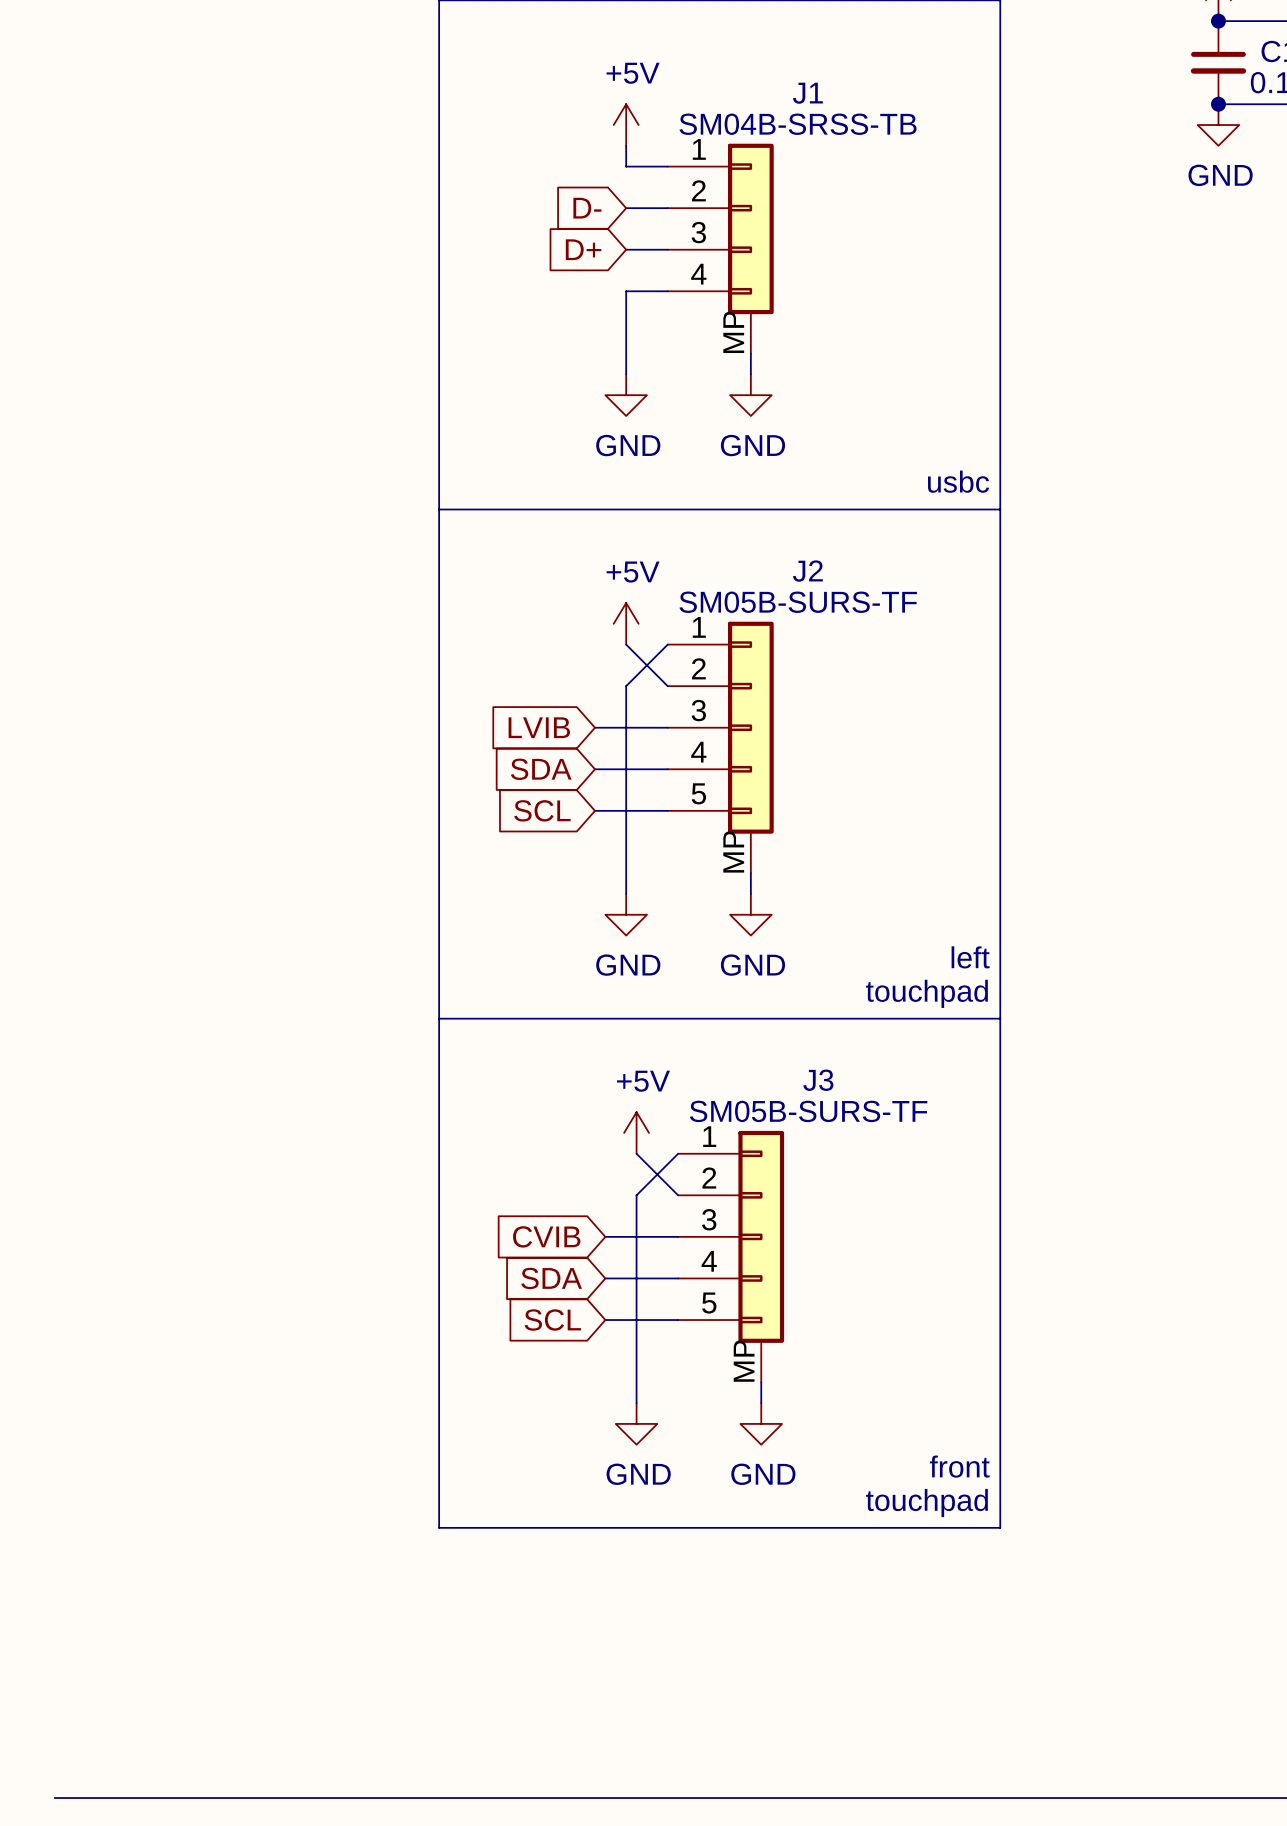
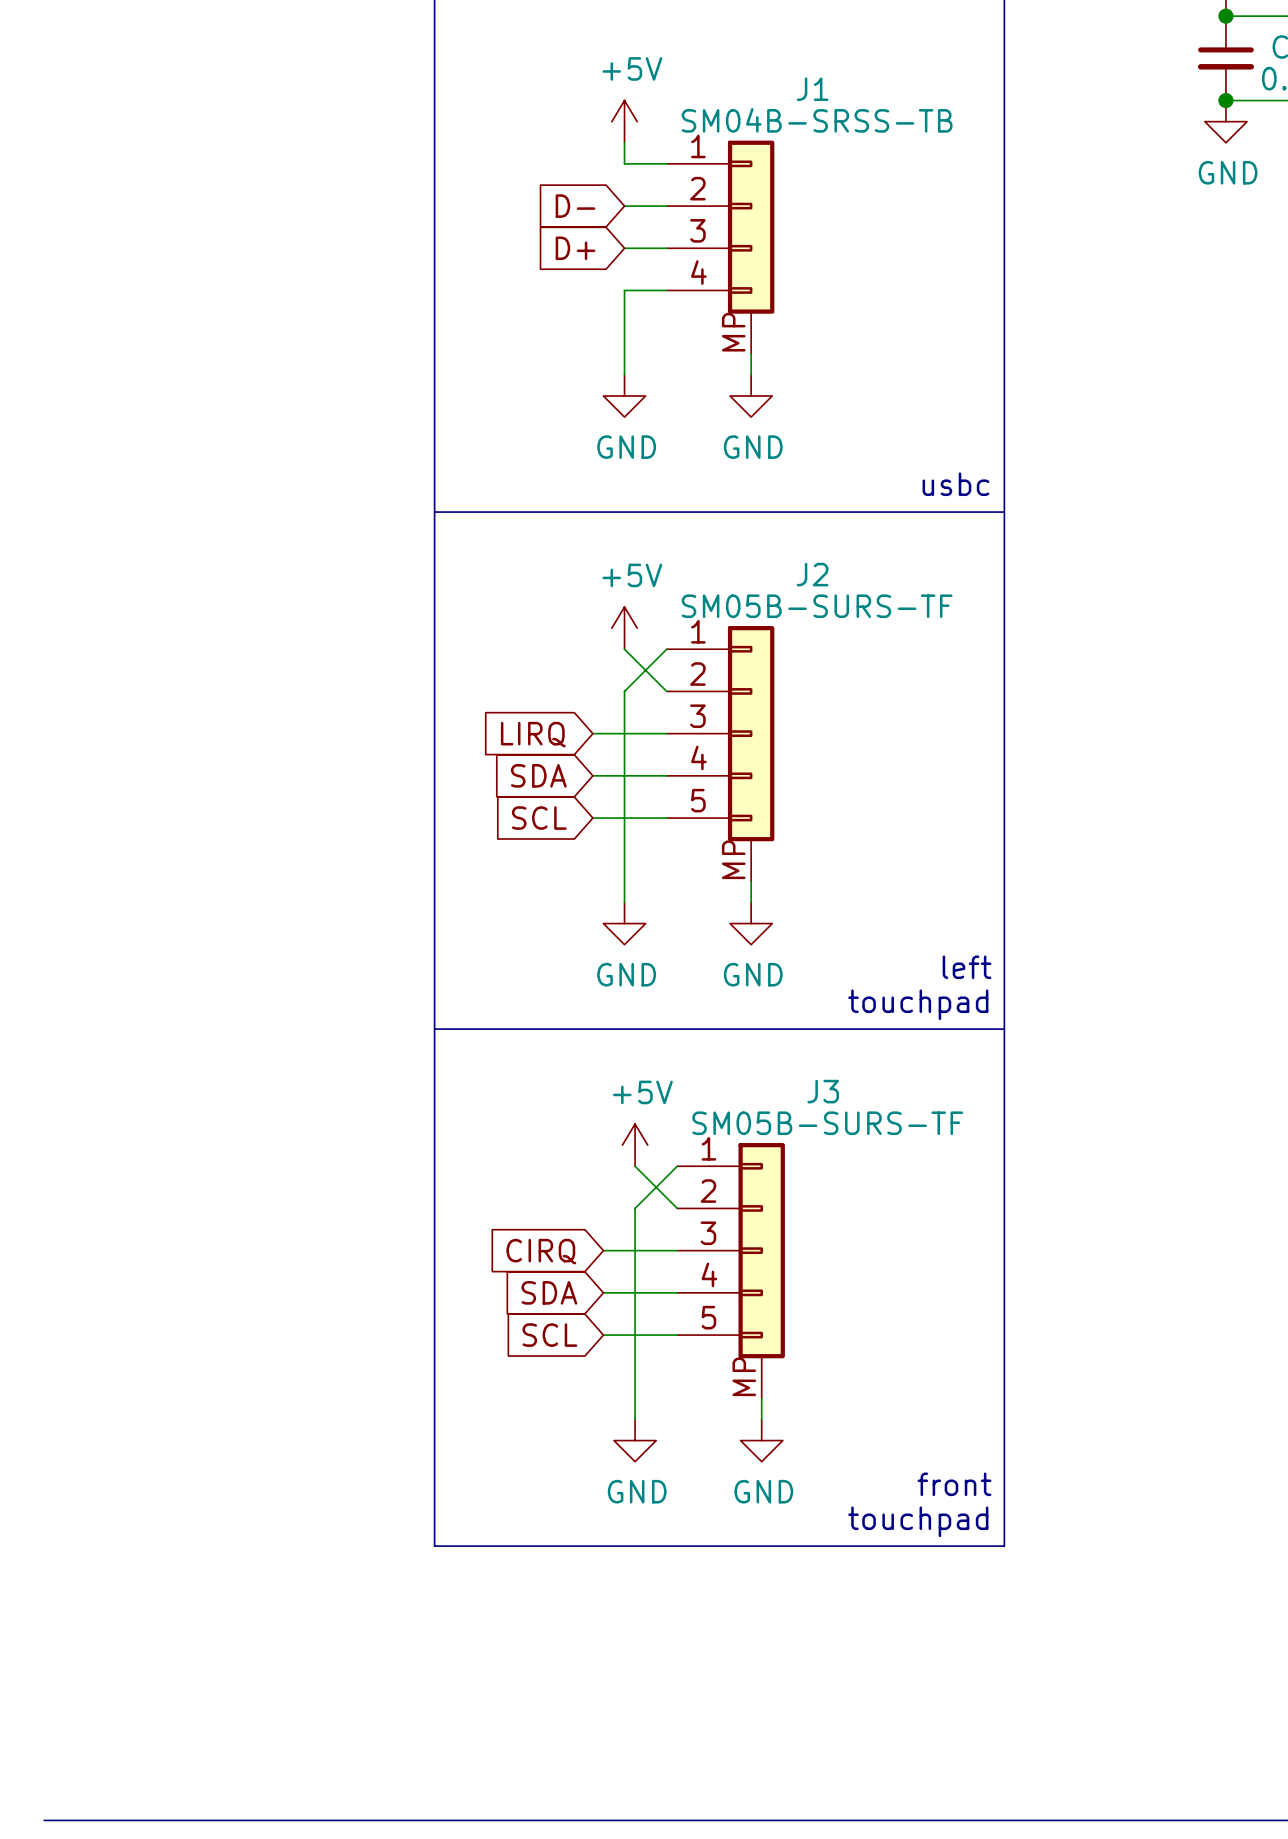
global label: LVIB (539, 727) -> LIRQ (533, 734)
global label: CVIB (546, 1236) -> CIRQ (541, 1251)

